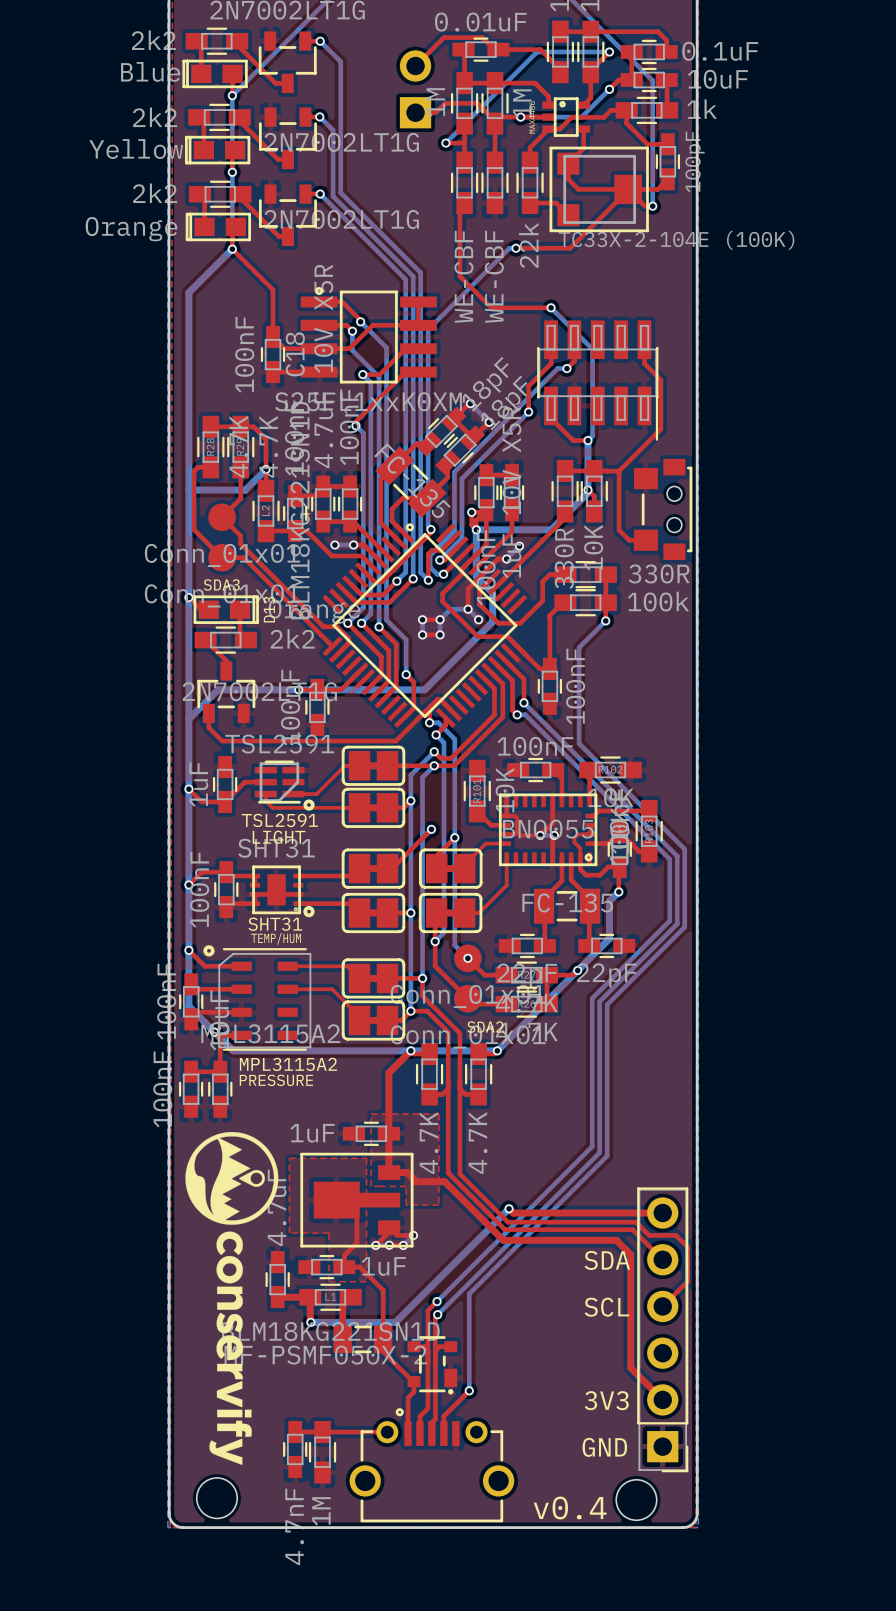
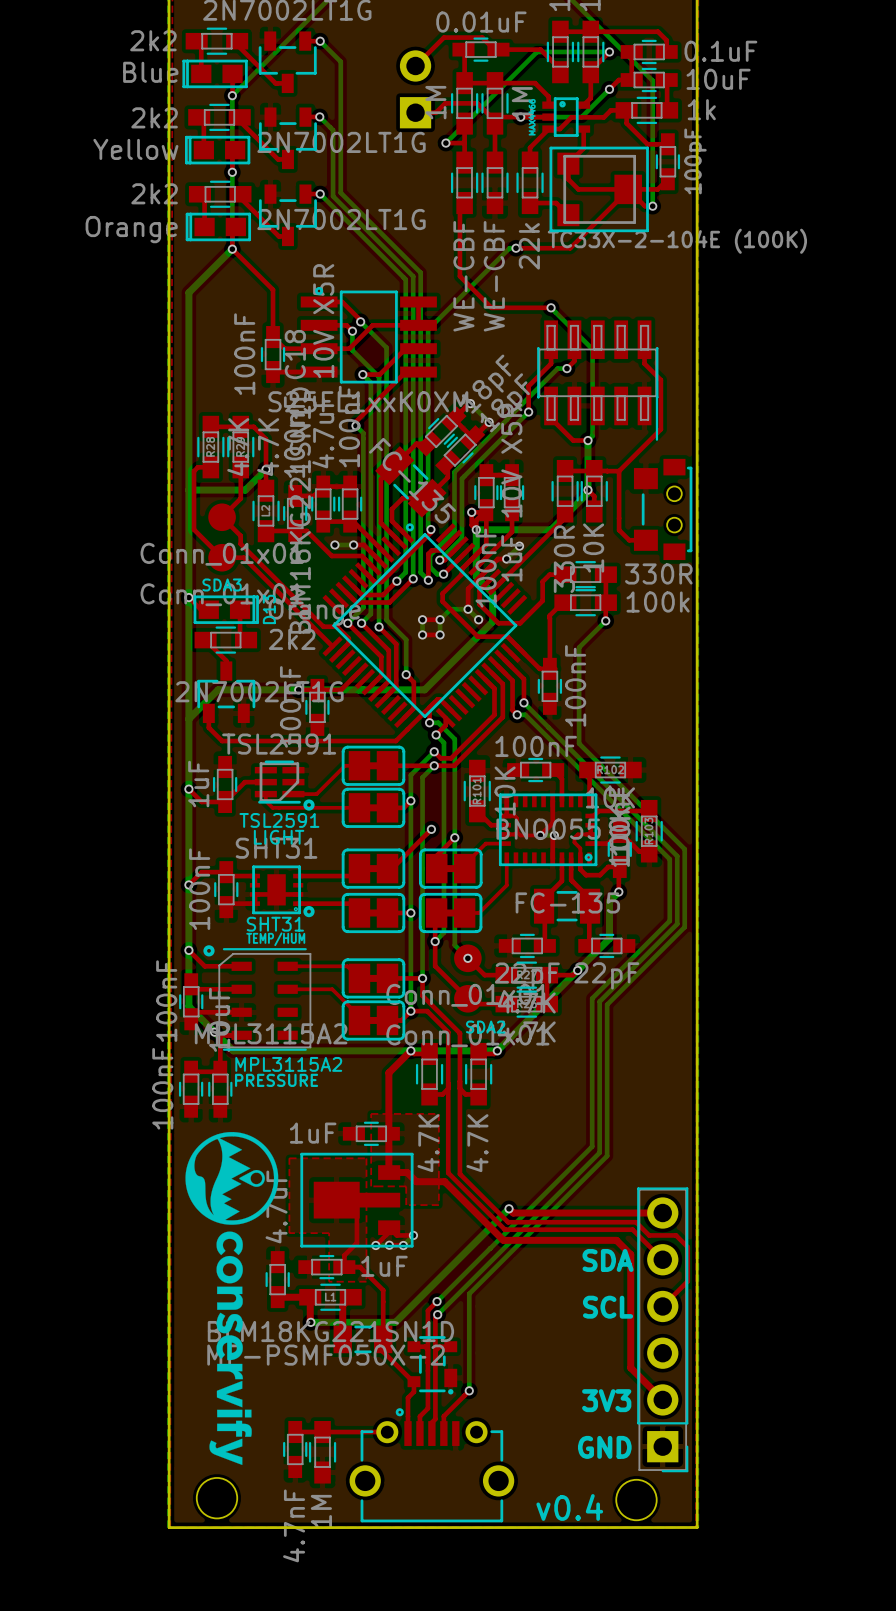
board edge: (169, 1513) (173, 1523) (182, 1527) (683, 1527) (693, 1523) (697, 1513) -> (169, 1527) (697, 1527) (697, 1513)

